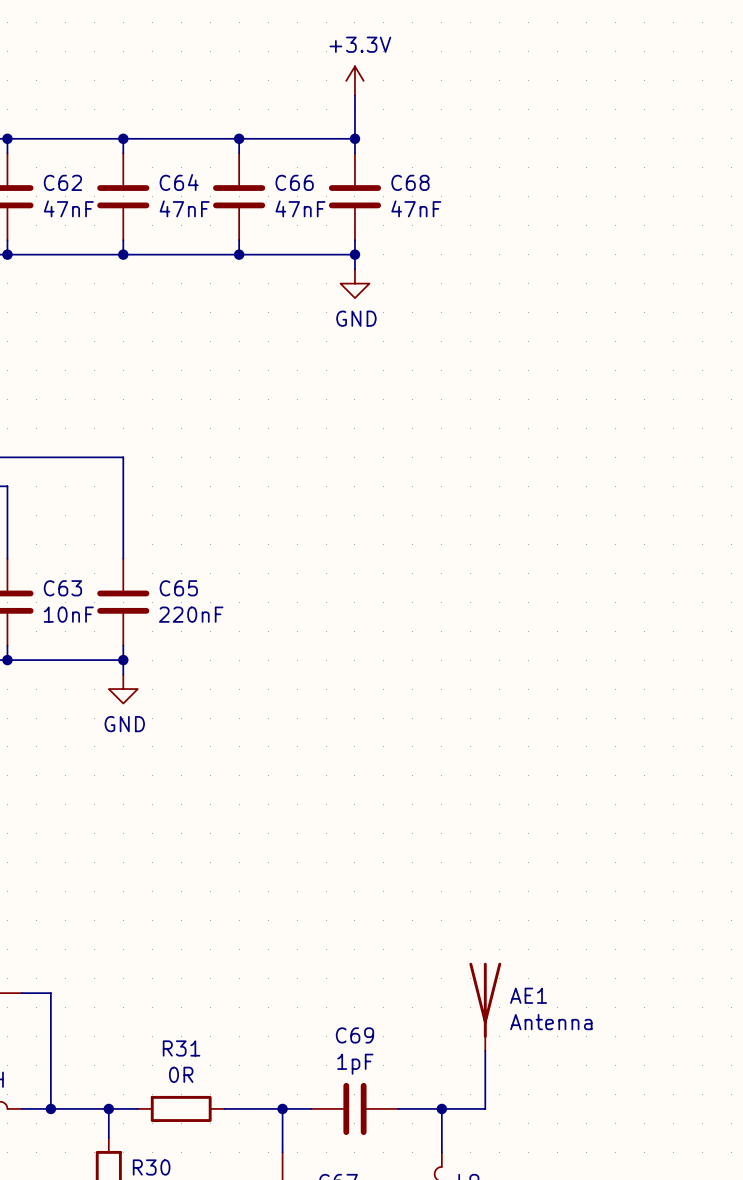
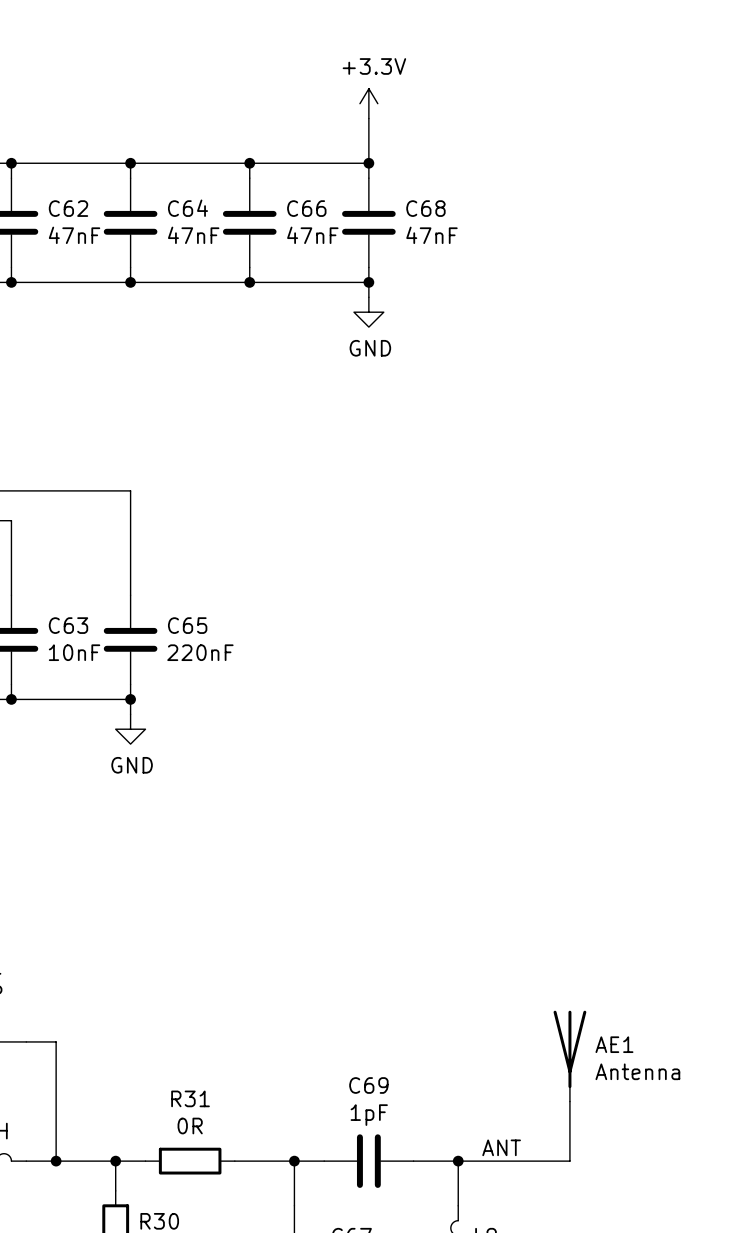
AE1 position: (485, 1006) -> (569, 1056)
wire: (485, 1051) (485, 1108) -> (569, 1101) (569, 1161) (502, 1161)
label: none -> ANT (501, 1147)

